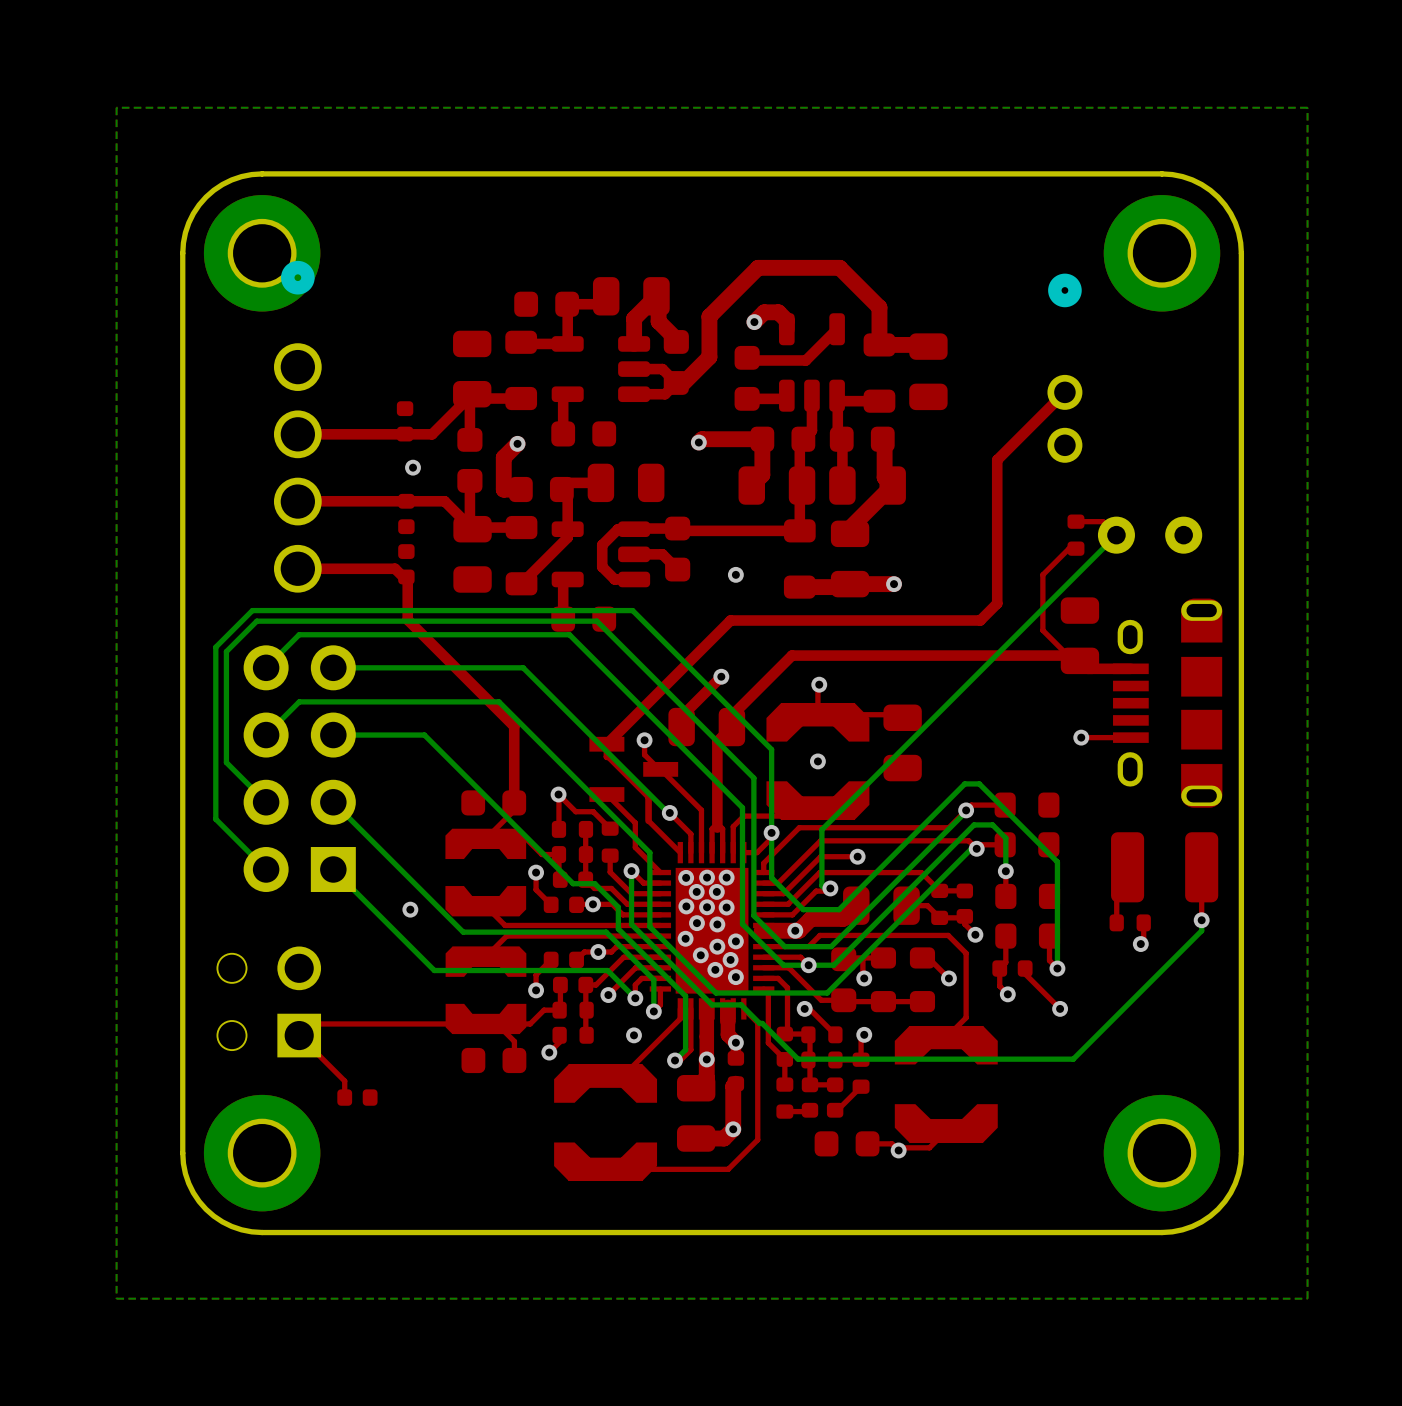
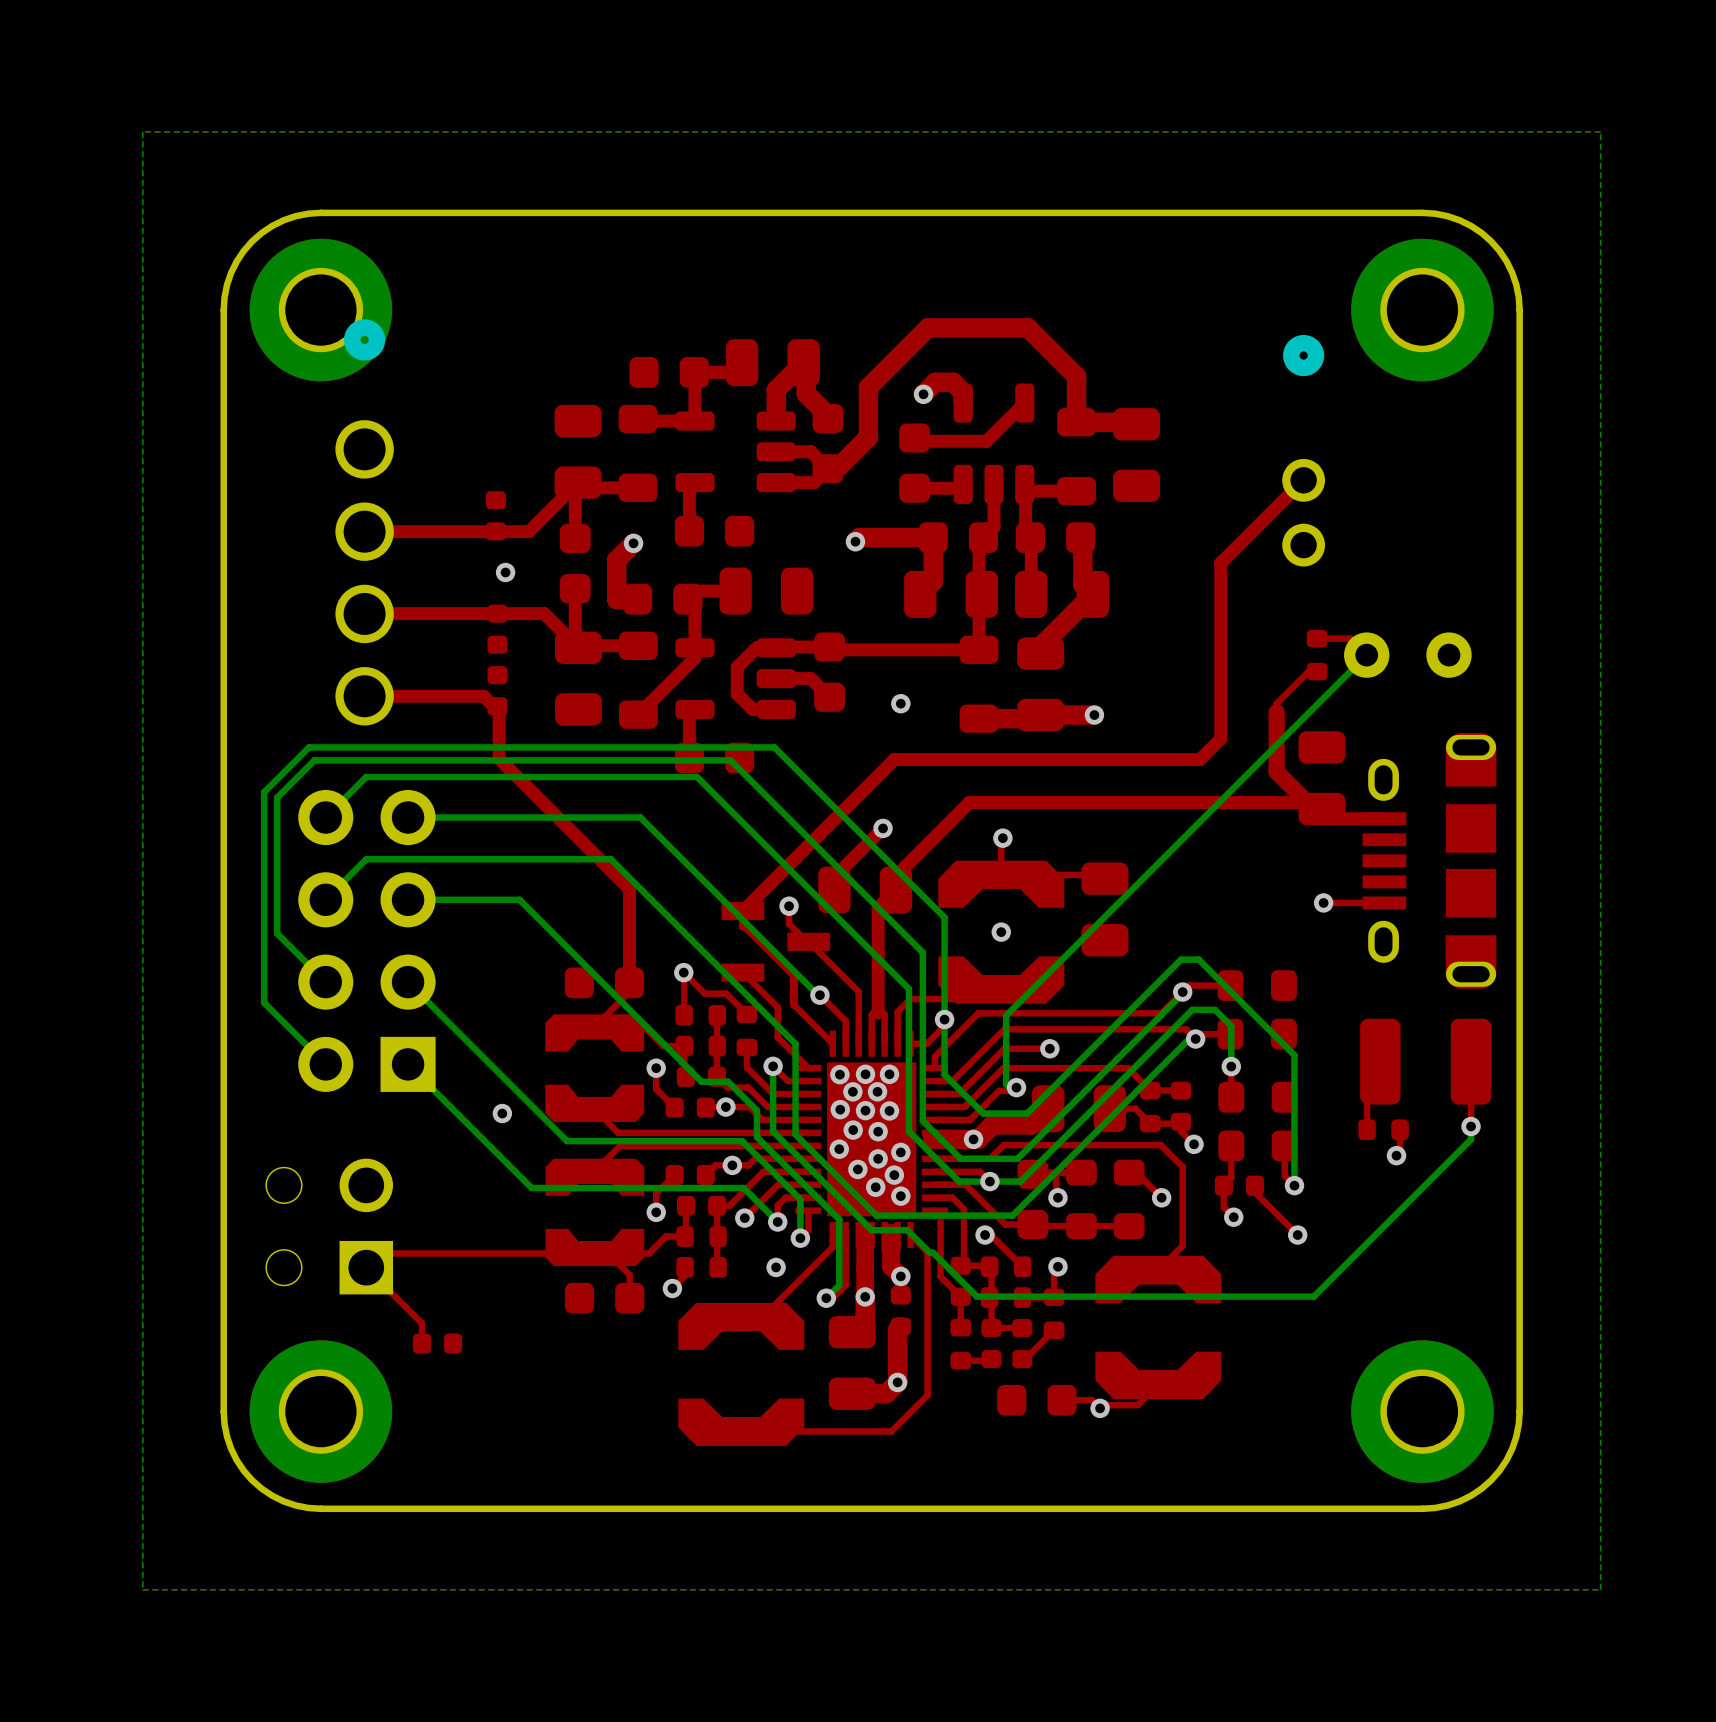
top track width: thin (1042, 581) (1042, 630) (1073, 660) -> thick (1276, 712) (1276, 771) (1313, 809)

